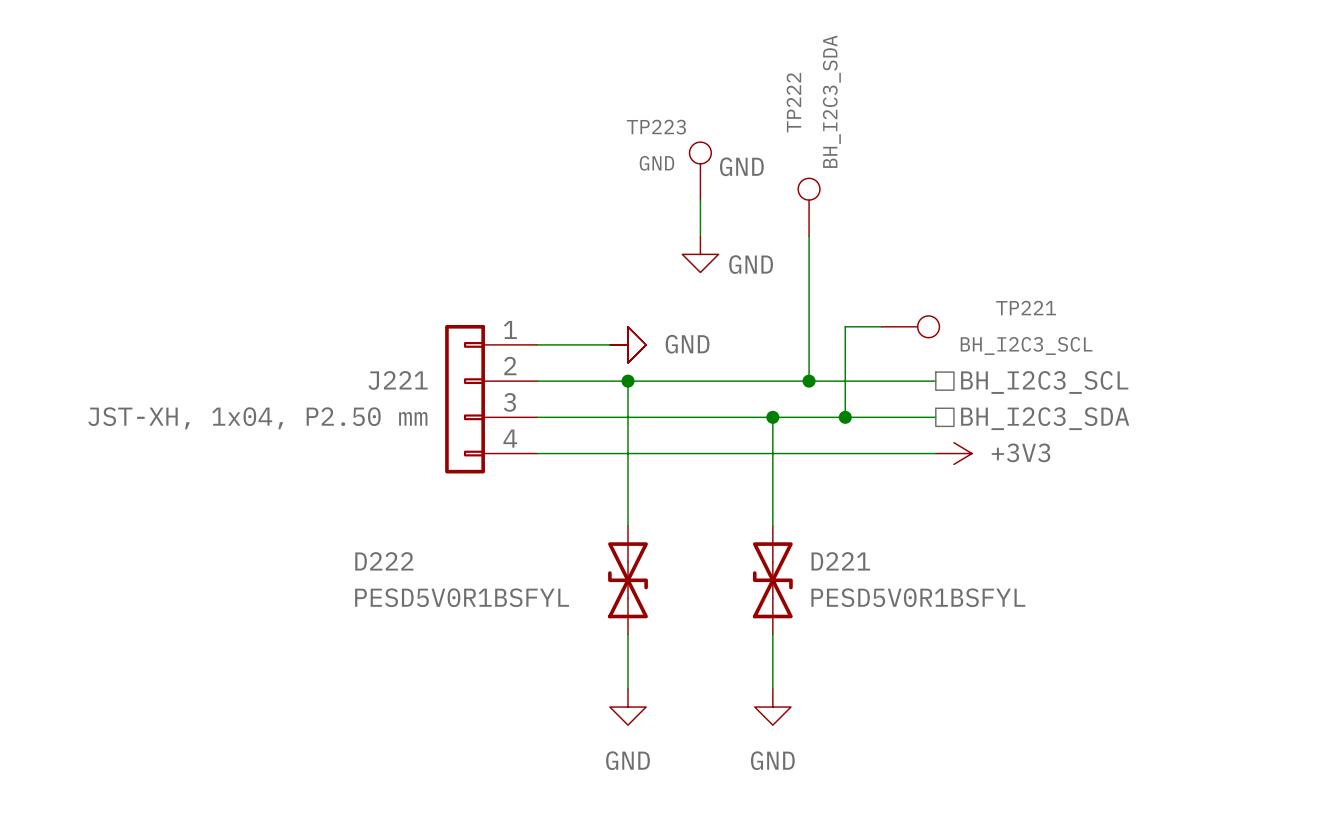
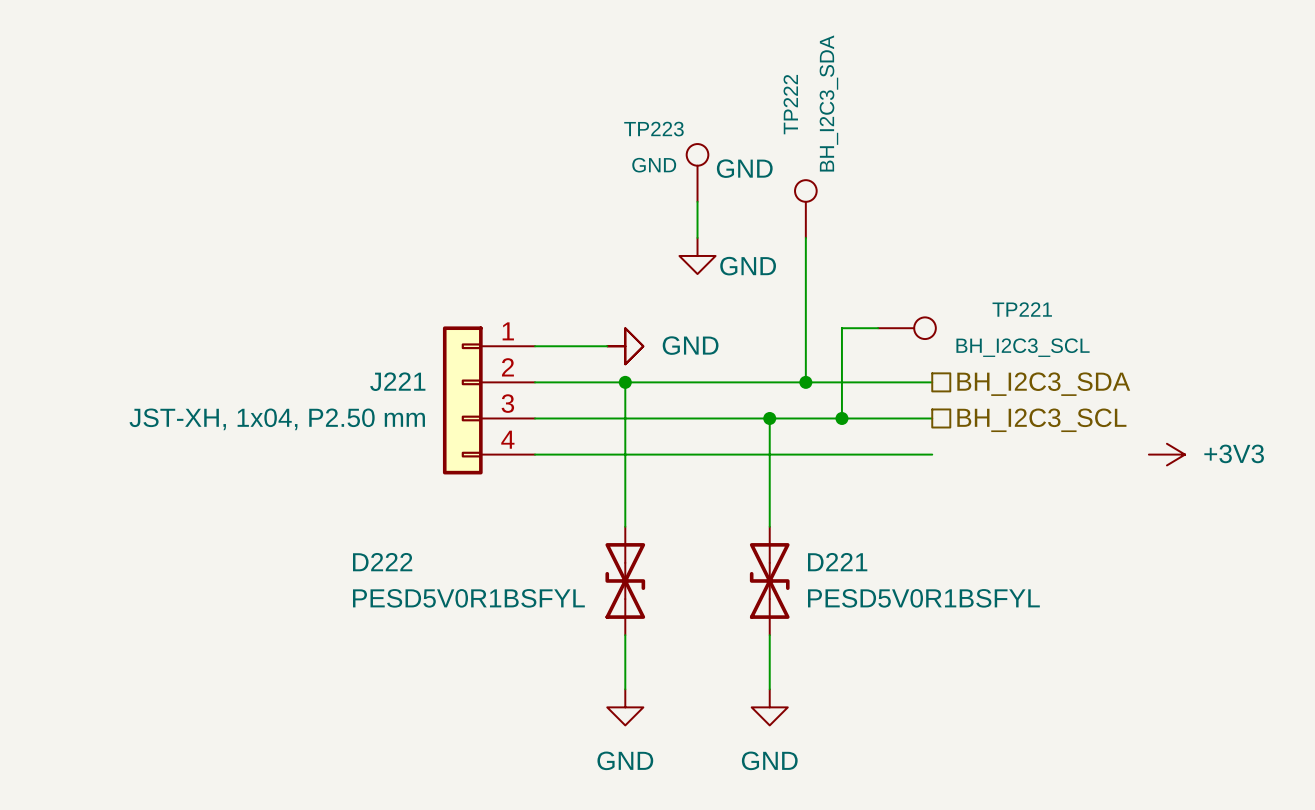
hierarchical label: BH_I2C3_SCL (1044, 382) -> BH_I2C3_SDA (1043, 384)
hierarchical label: BH_I2C3_SDA (1045, 418) -> BH_I2C3_SCL (1041, 420)
power symbol position: +3V3 (953, 453) -> +3V3 (1166, 454)

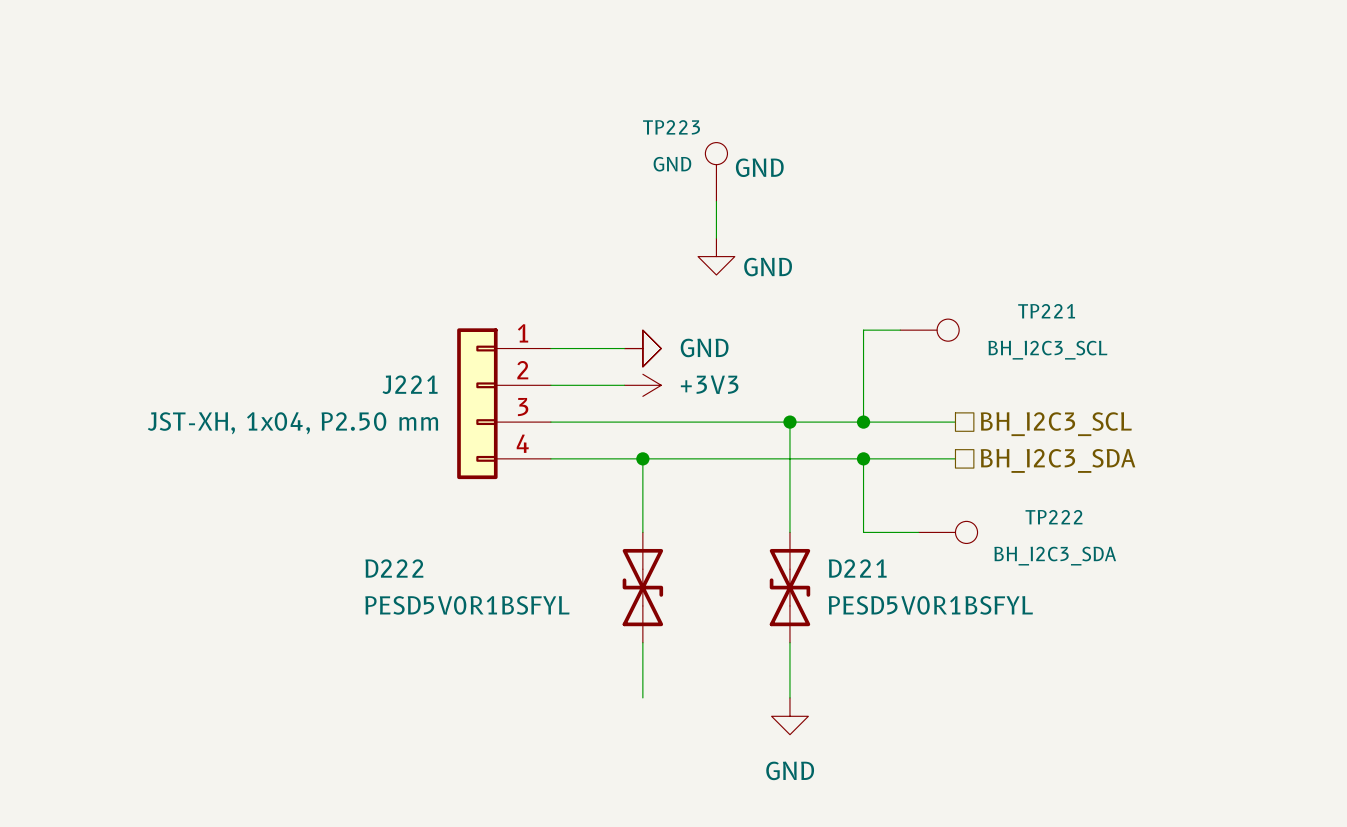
TP222 rotation: 0° (805, 190) -> 90° clockwise (966, 532)
TP222 position: (805, 209) -> (948, 532)
wire: (805, 237) (805, 382) -> none
wire: (607, 382) (932, 382) -> none
wire: (625, 382) (625, 454) -> none
junction position: (625, 382) -> (642, 458)
power symbol: none -> +3V3 (642, 385)
junction position: (805, 382) -> (863, 458)
hierarchical label position: BH_I2C3_SDA (1043, 384) -> BH_I2C3_SDA (1058, 460)
wire: none -> (863, 458) (863, 532) (918, 532)
power symbol: +3V3 (1166, 454) -> none
power symbol: GND (625, 707) -> none

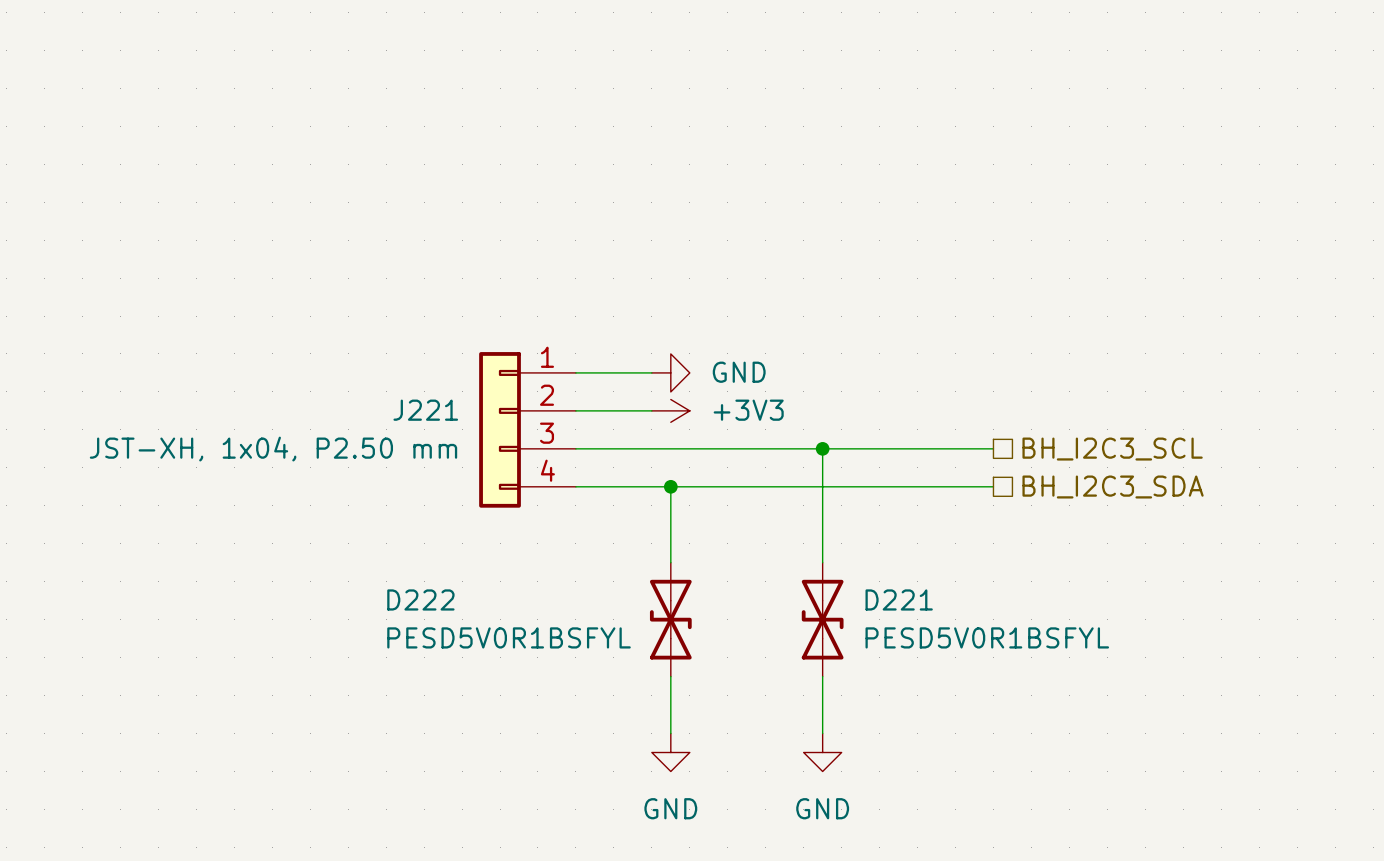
TP223: GND (716, 172) -> none
wire: (716, 201) (716, 238) -> none
power symbol: GND (716, 256) -> none
wire: (900, 330) (863, 330) (863, 422) -> none
TP221: BH_I2C3_SCL (929, 330) -> none
power symbol: GND (642, 348) -> none
junction: (863, 422) -> none
wire: (863, 458) (863, 532) (918, 532) -> none
junction: (863, 458) -> none
TP222: BH_I2C3_SDA (948, 532) -> none
power symbol: none -> GND (670, 752)

